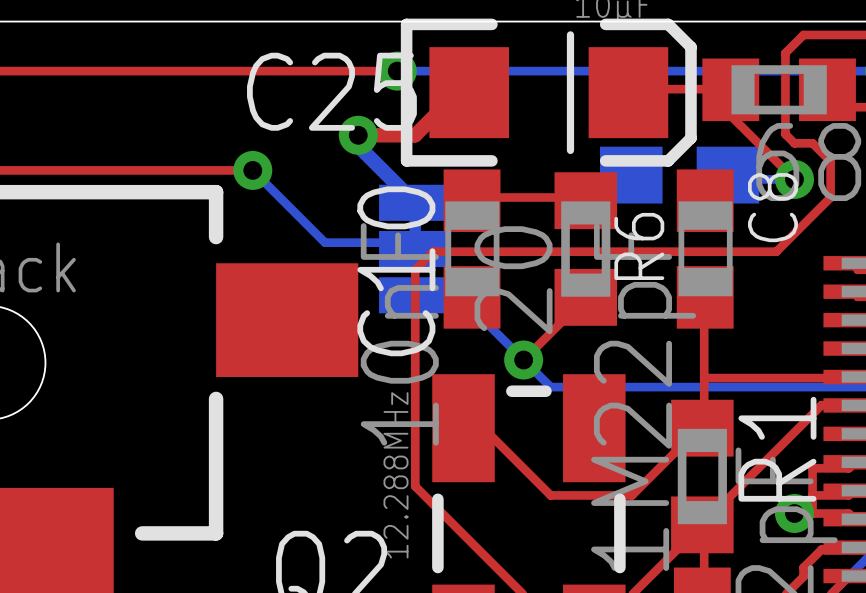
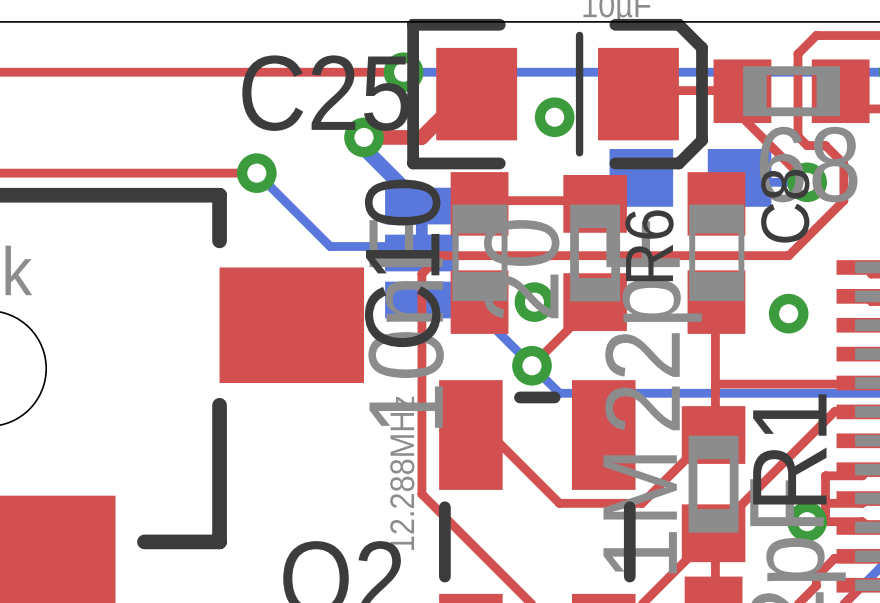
via: none -> (554, 117)
via: none -> (534, 302)
via: none -> (788, 313)

